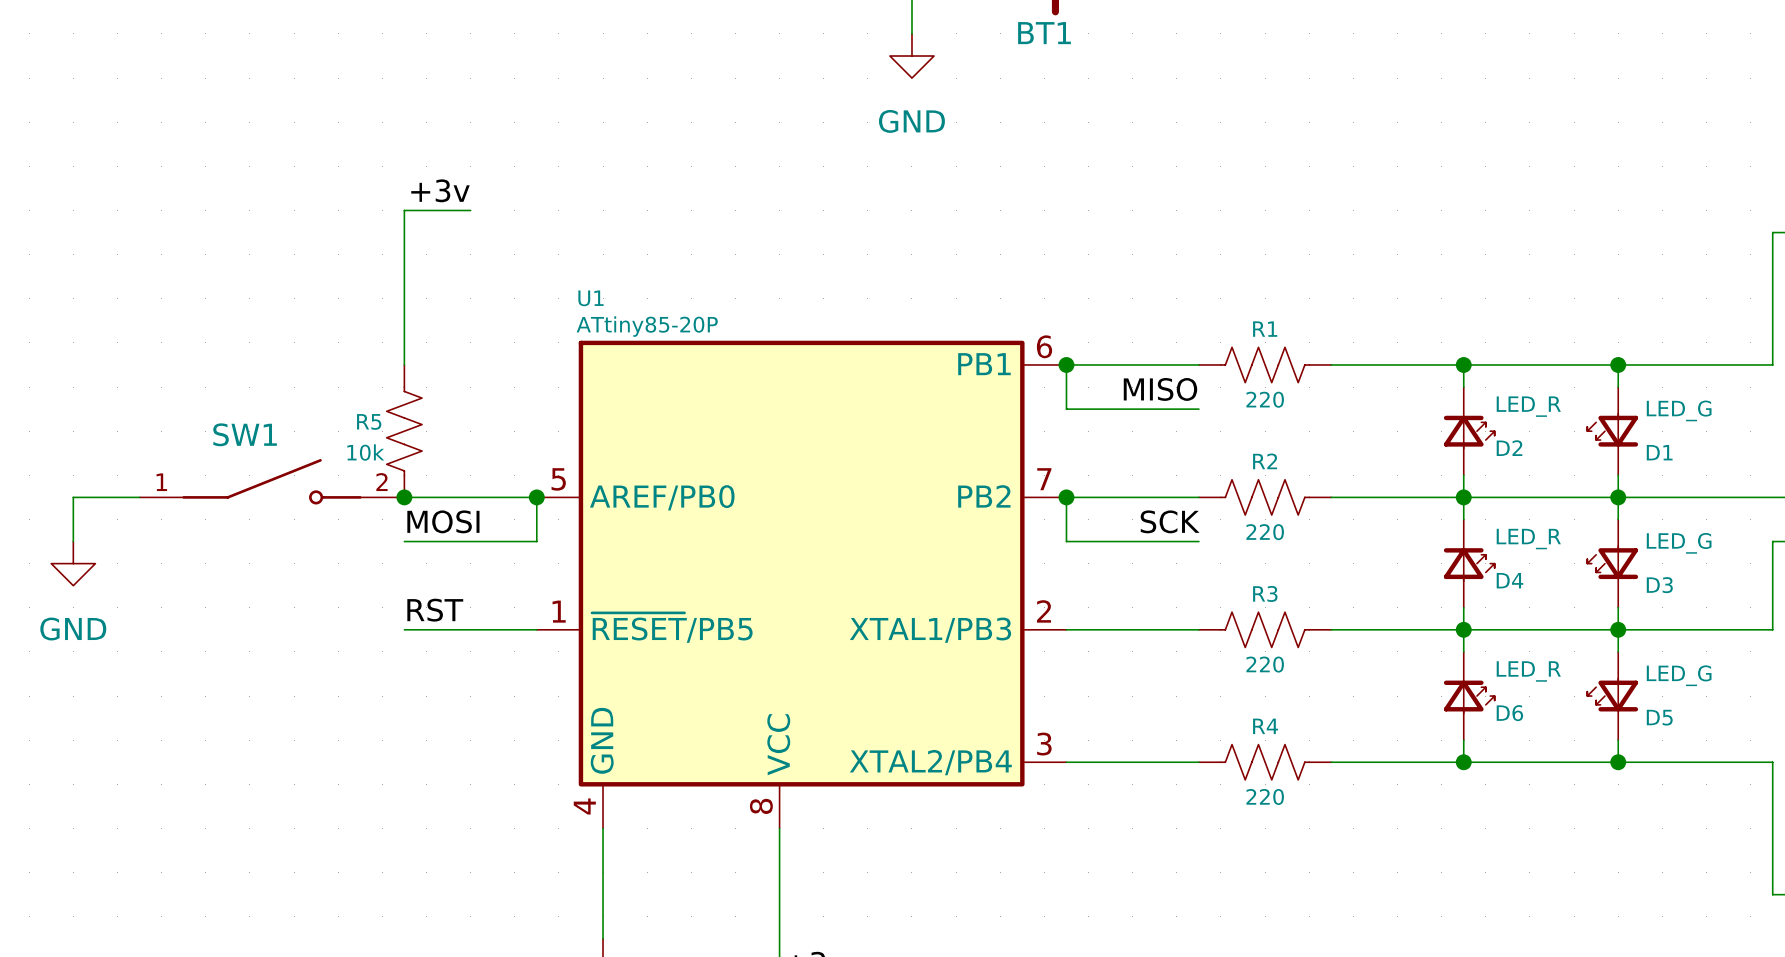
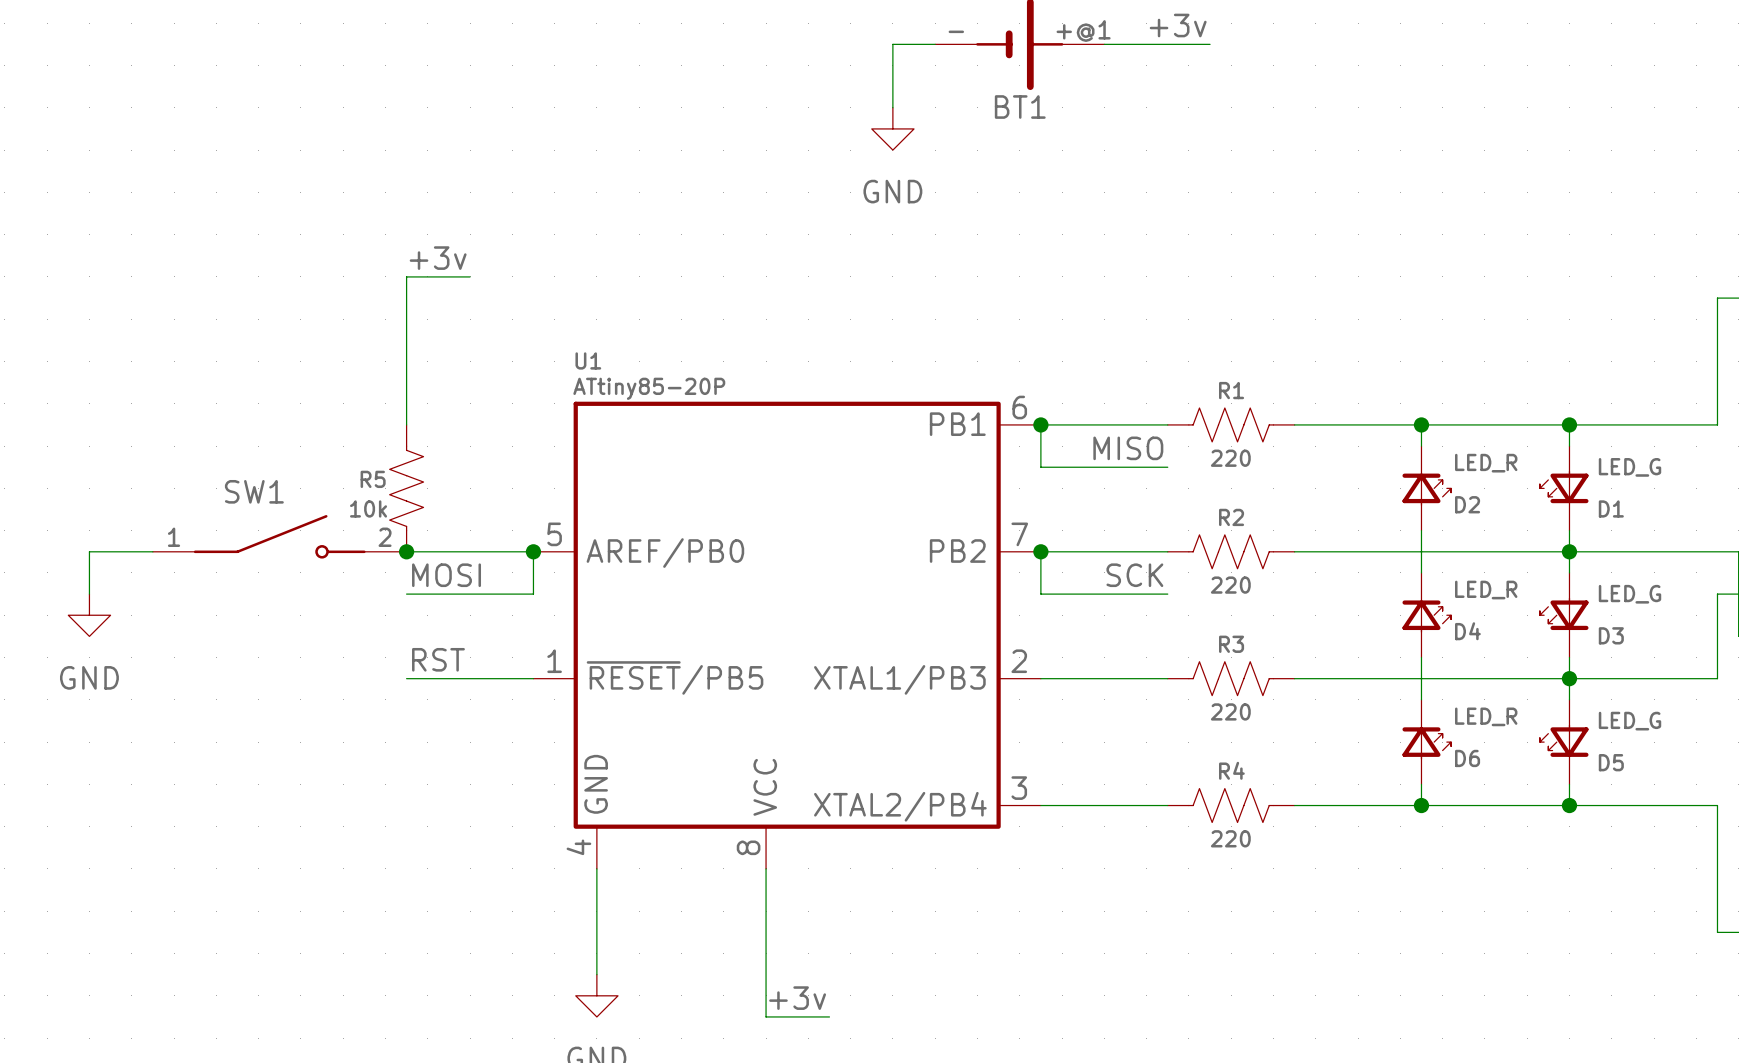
junction: (1463, 497) -> none
junction: (1463, 629) -> none

